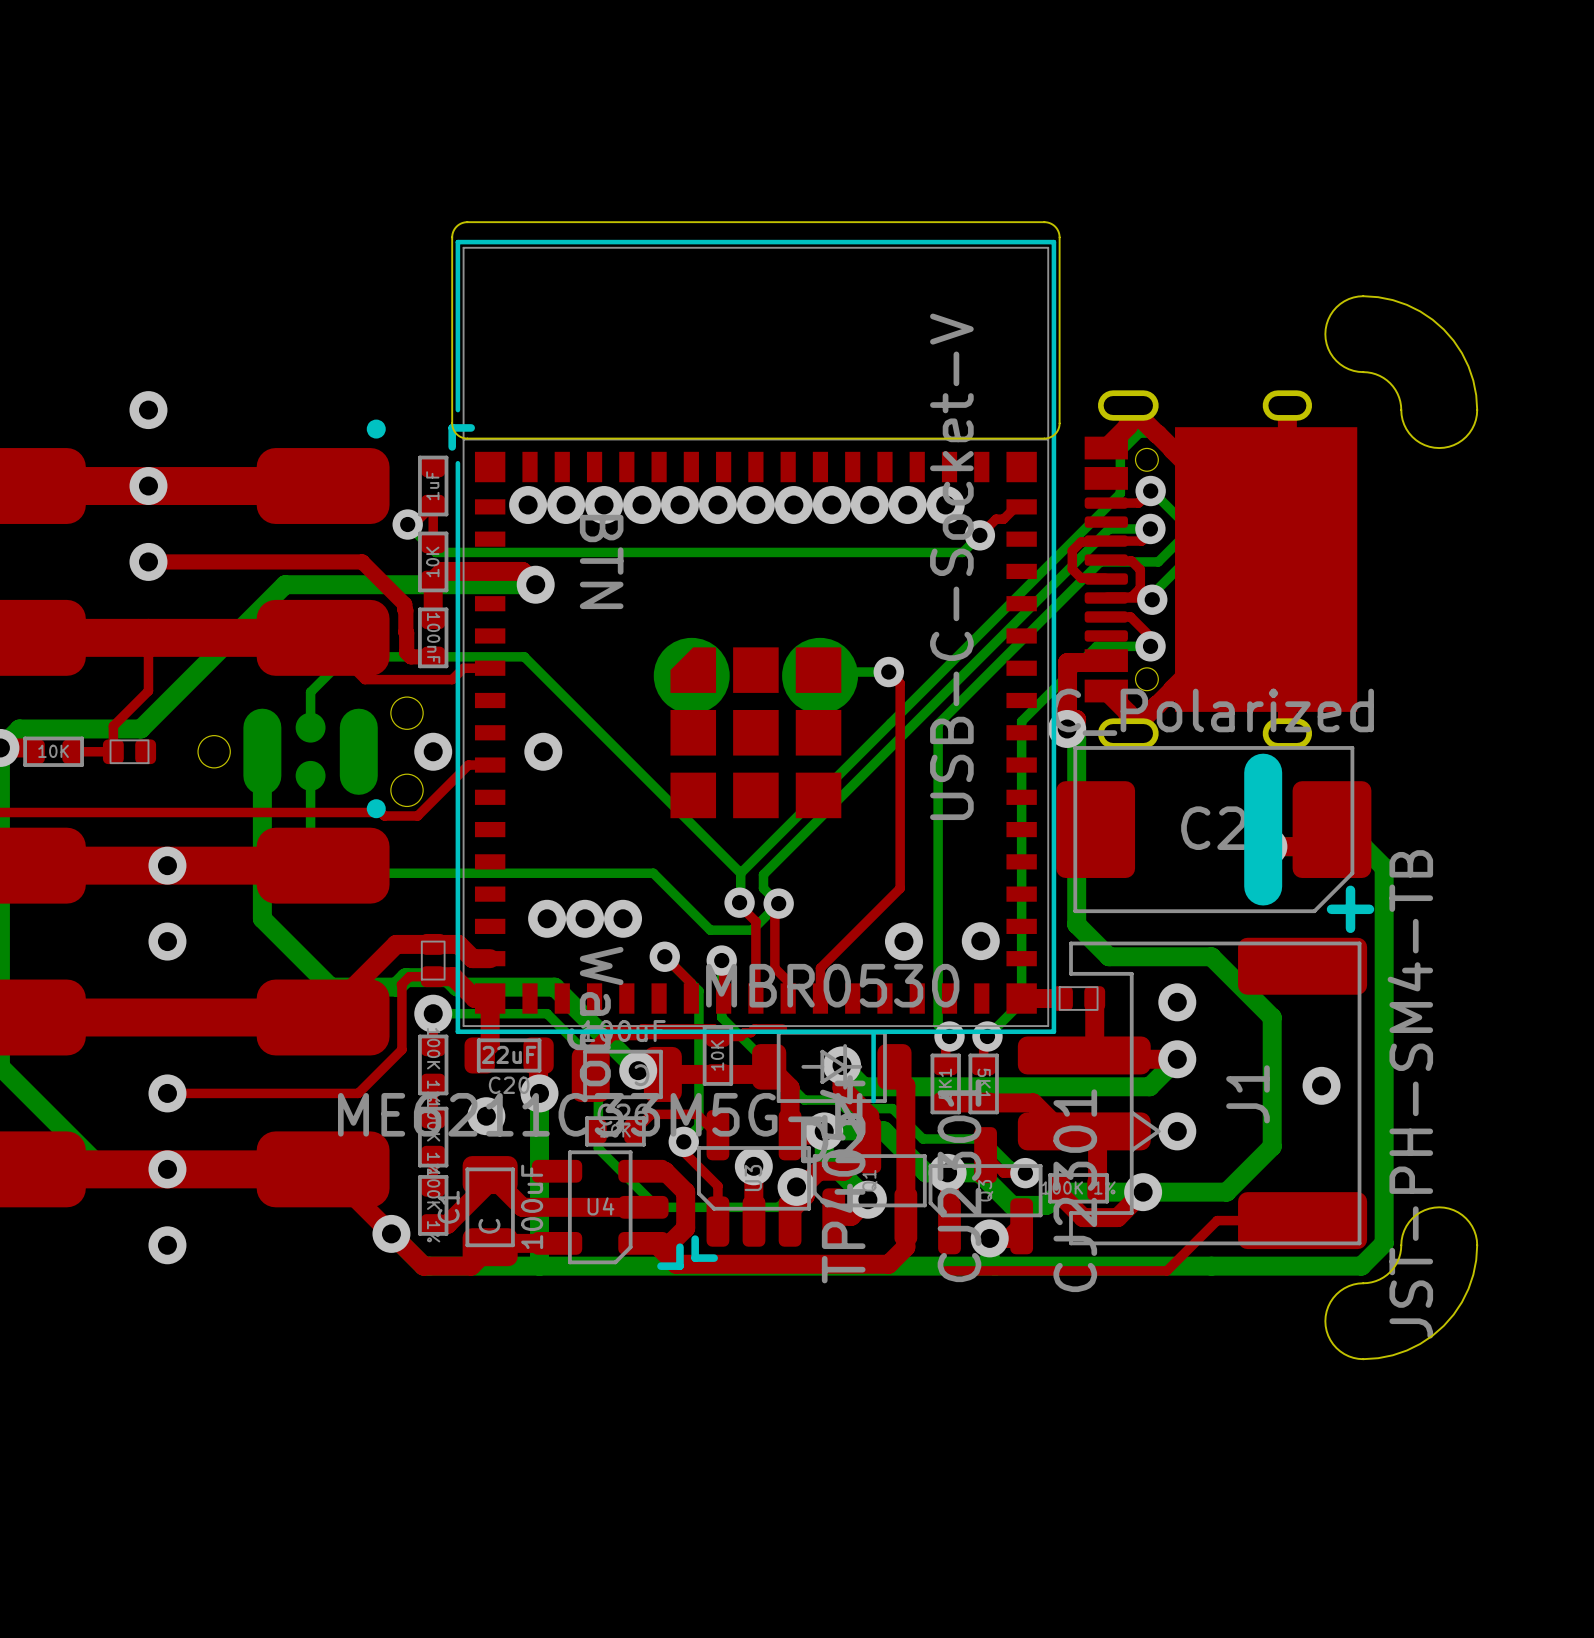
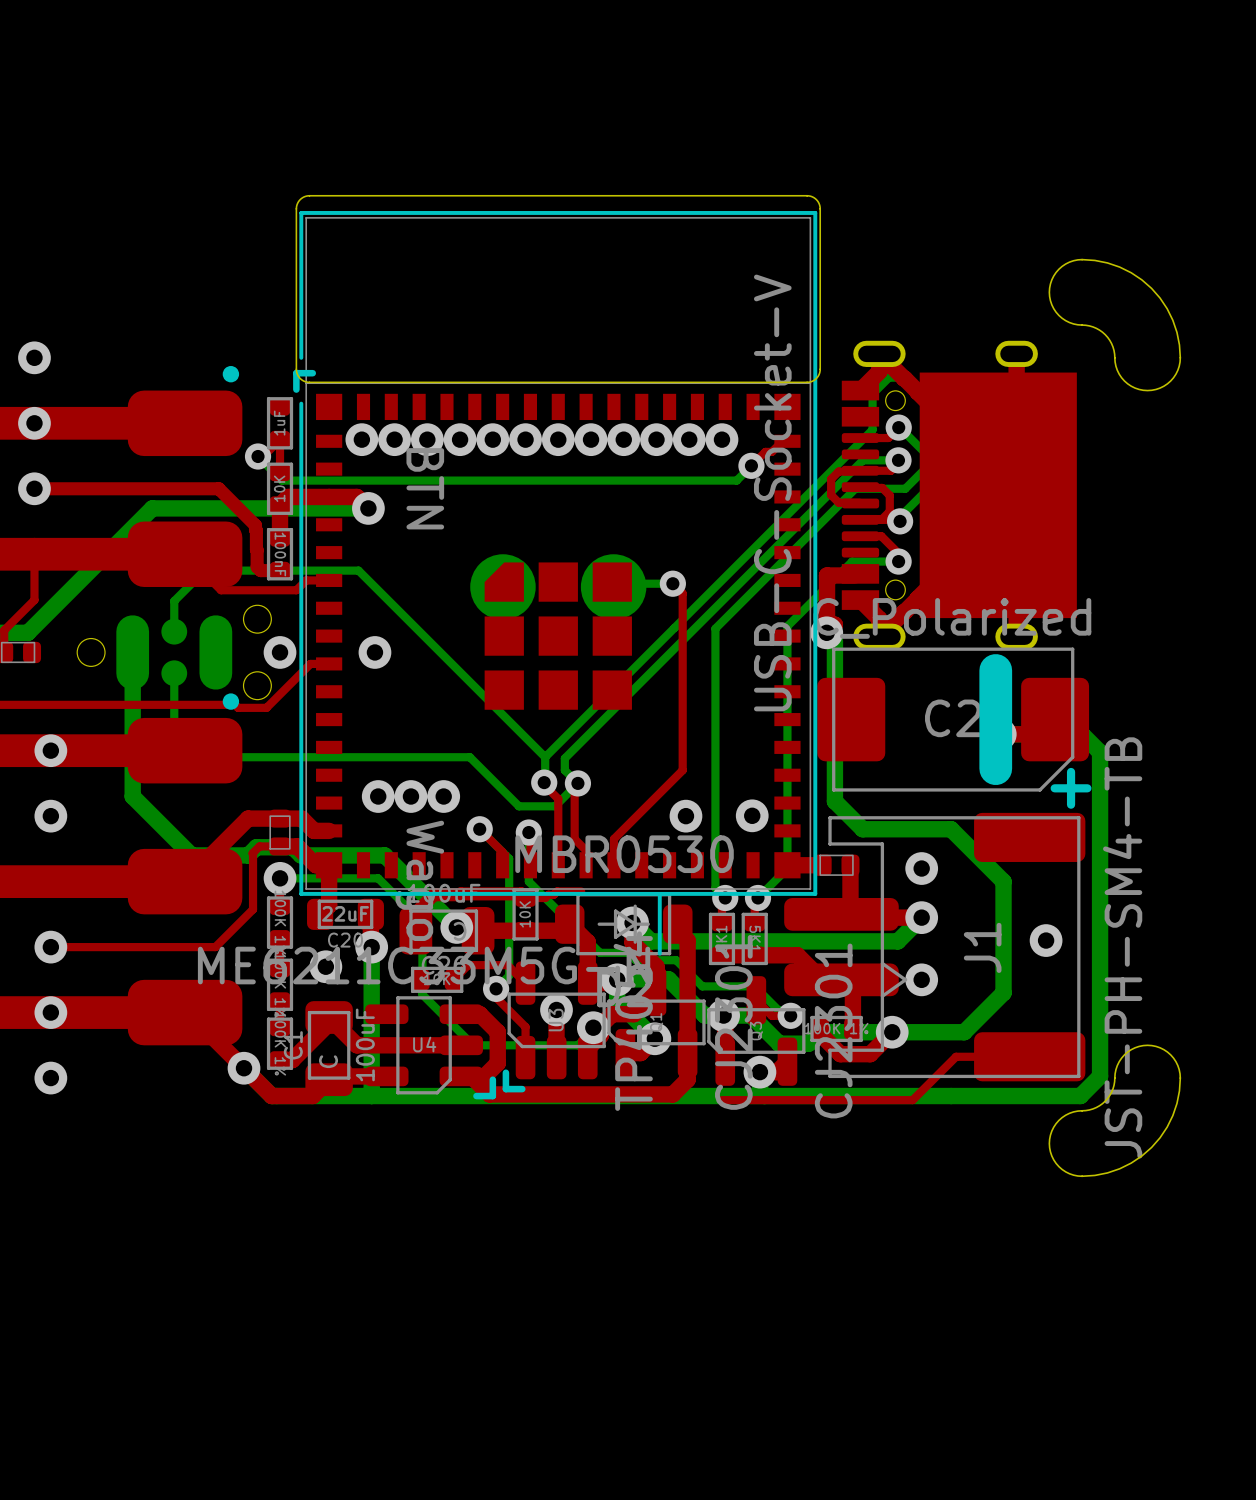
part value position: USB-C-Socket-V (951, 566) -> USB-C-Socket-V (772, 492)

